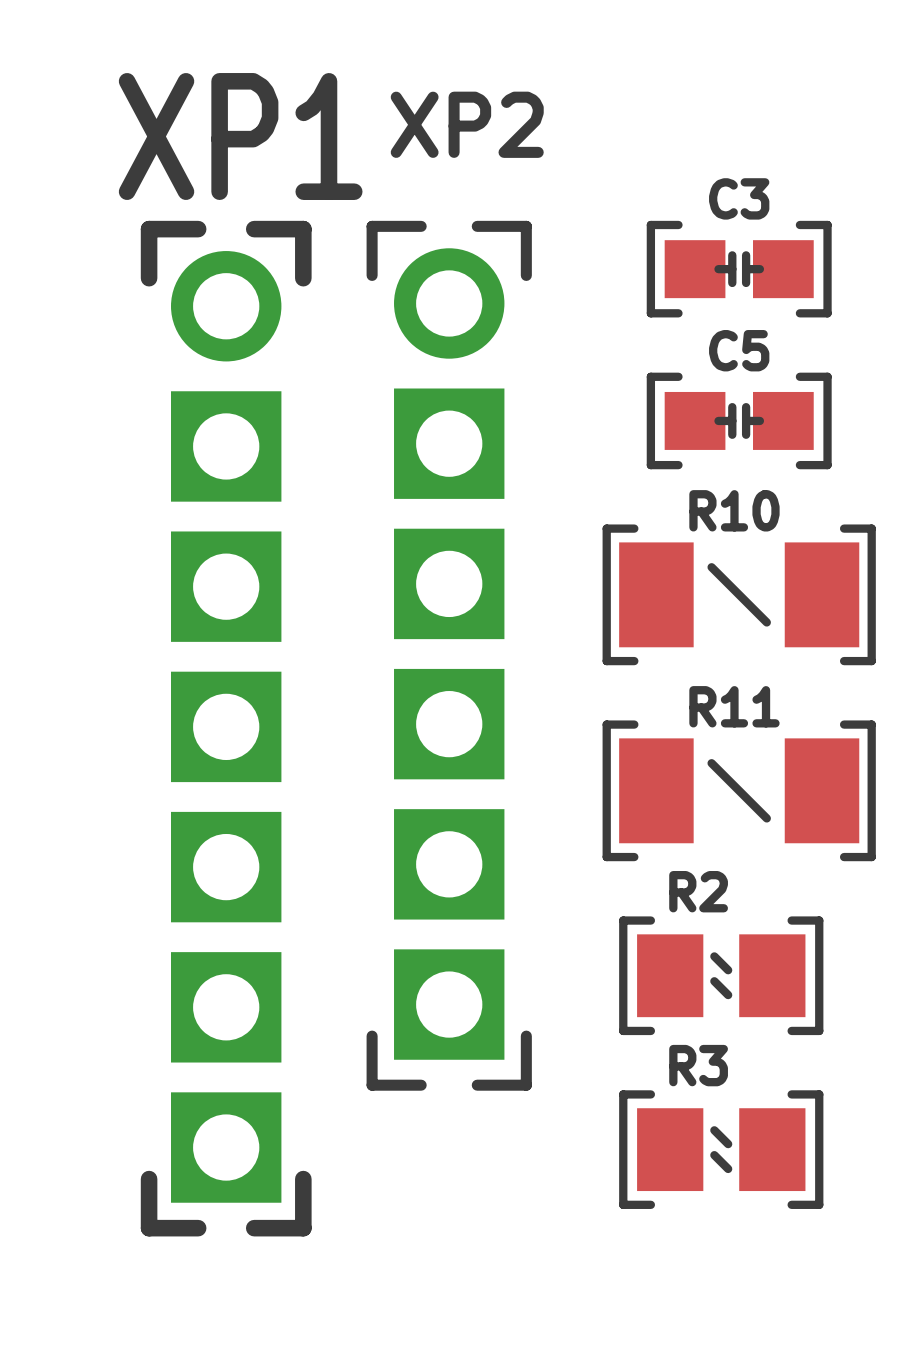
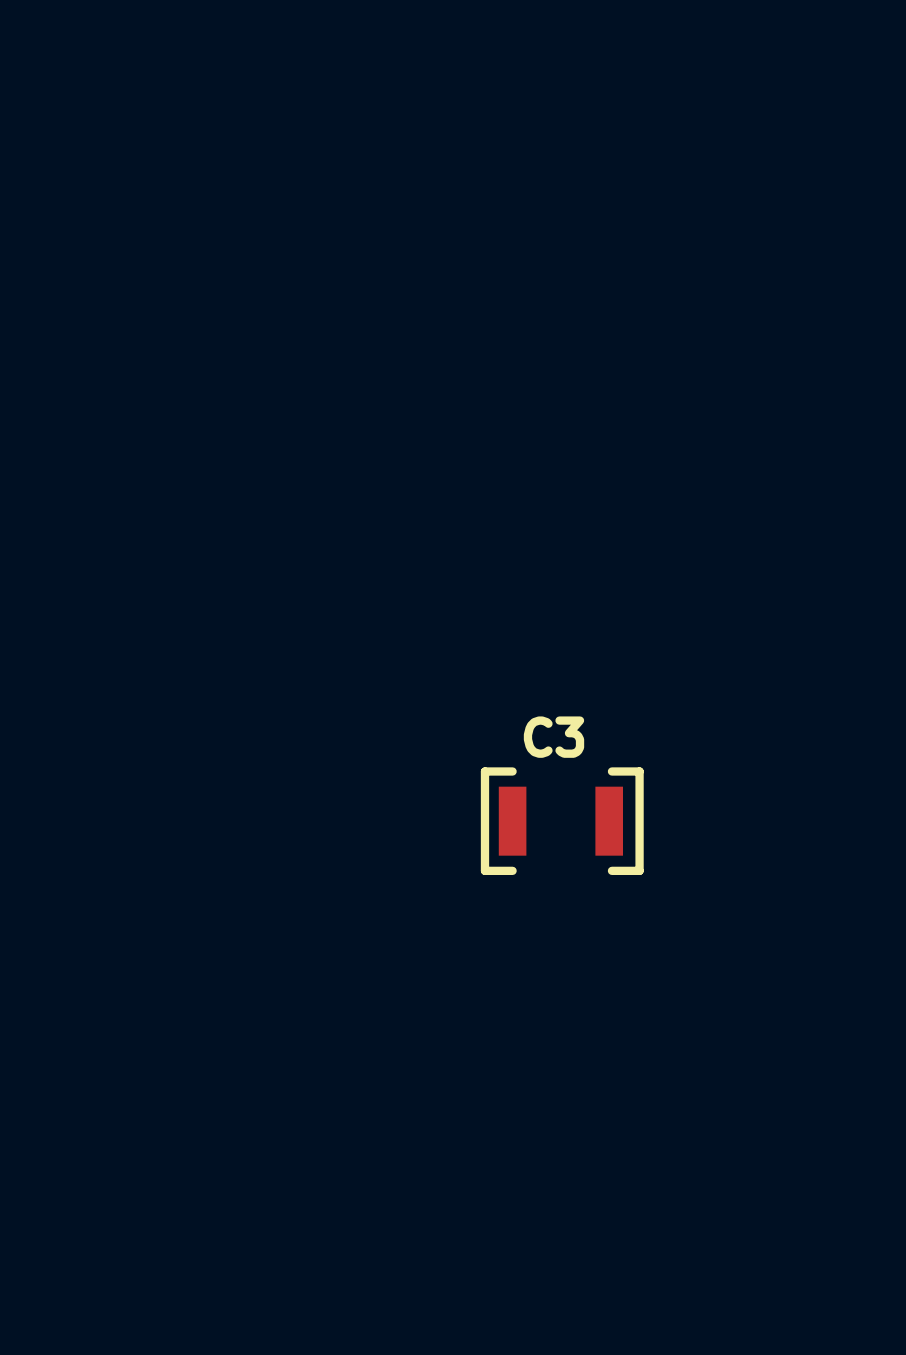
C3 footprint: [646, 220, 832, 318] -> [480, 767, 644, 876]
C5: (739, 420) -> none
R10: (739, 594) -> none
XP2: (449, 655) -> none
XP1: (226, 728) -> none
R11: (739, 790) -> none
R2: (721, 975) -> none
R3: (721, 1149) -> none

